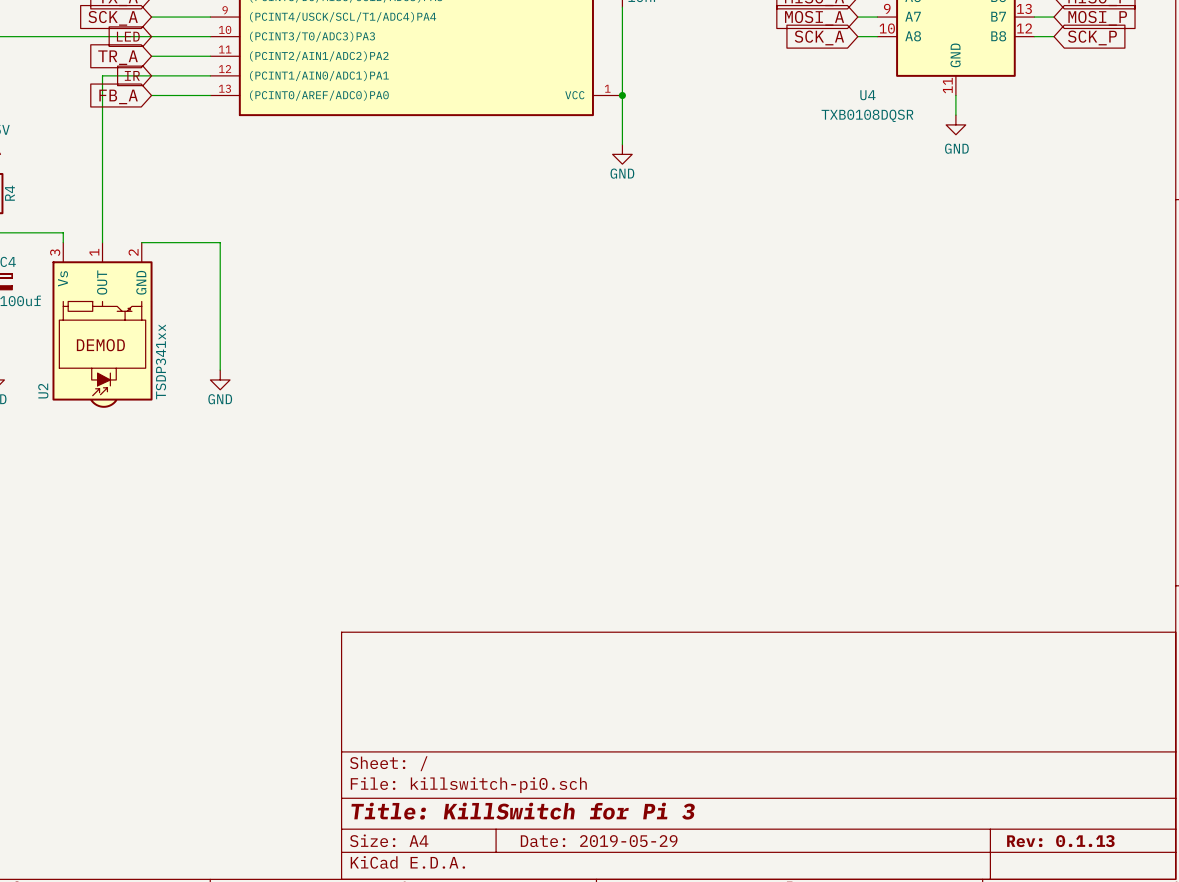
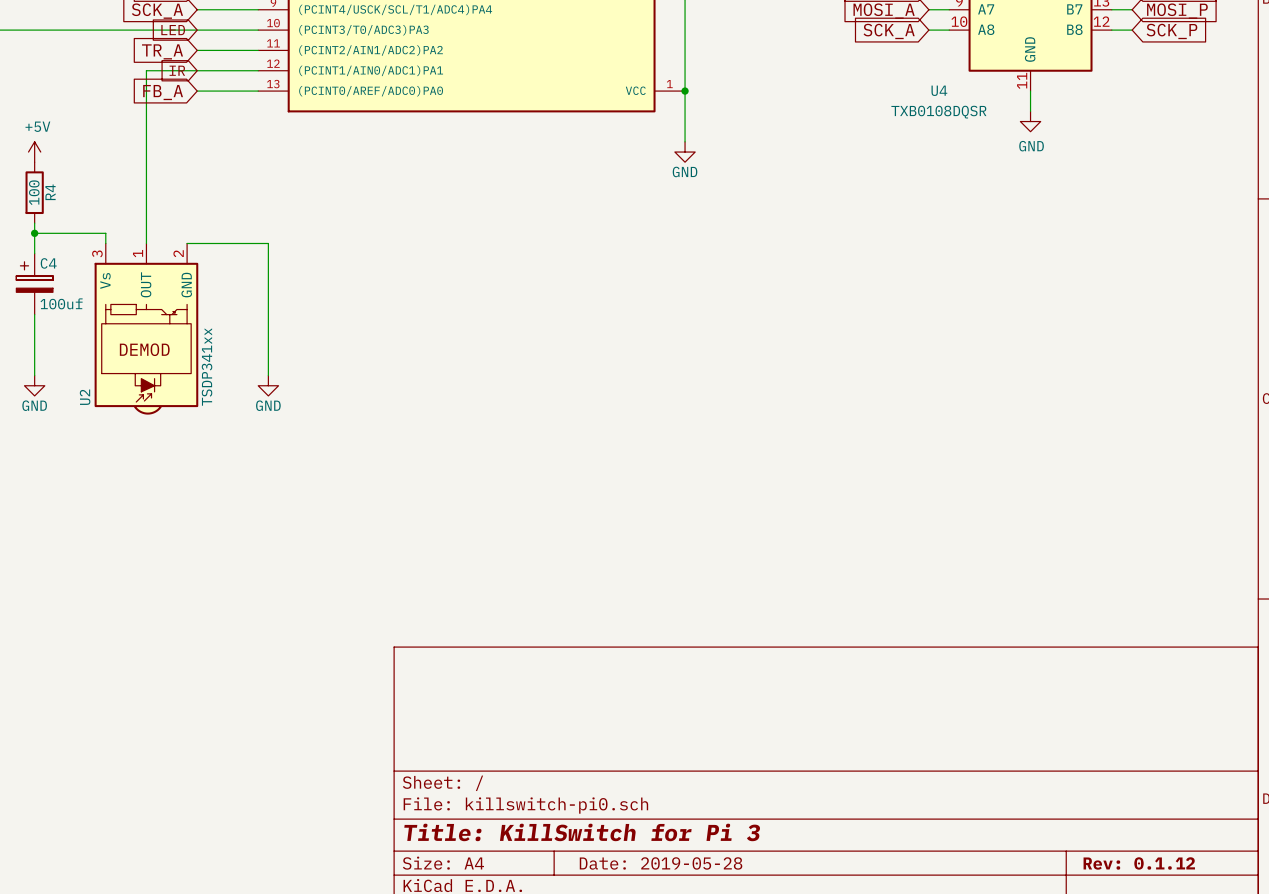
title block: Date: 2019-05-29 (599, 841) -> Date: 2019-05-28 (661, 863)
title block: Rev: 0.1.13 (1060, 841) -> Rev: 0.1.12 (1139, 863)

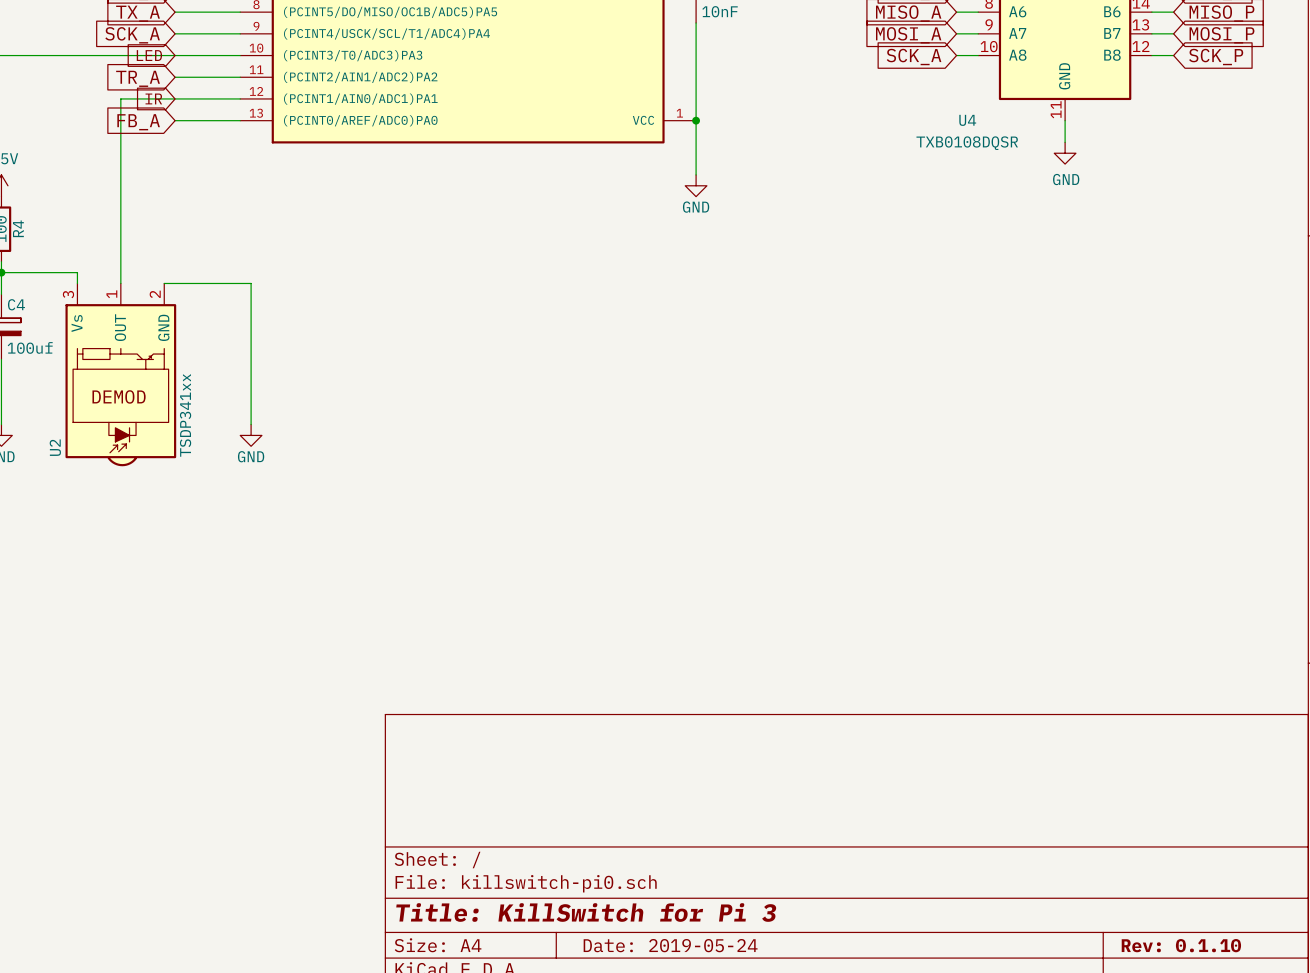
title block: Date: 2019-05-28 (661, 863) -> Date: 2019-05-24 (670, 945)
title block: Rev: 0.1.12 (1139, 863) -> Rev: 0.1.10 (1181, 945)

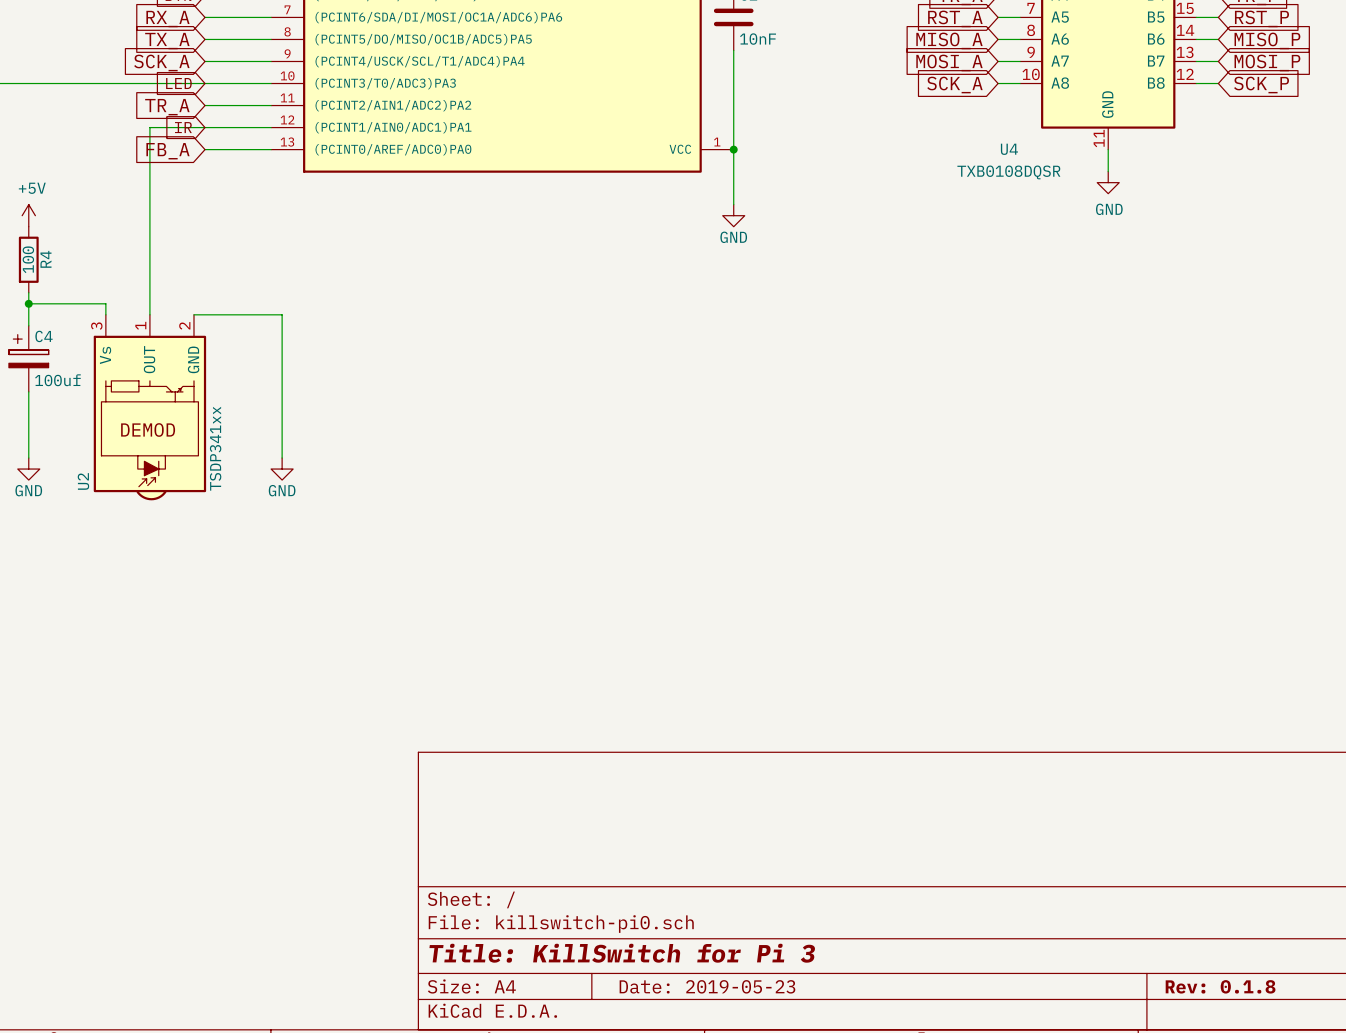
title block: Date: 2019-05-24 (670, 945) -> Date: 2019-05-23 (707, 986)
title block: Rev: 0.1.10 (1181, 945) -> Rev: 0.1.8 (1220, 986)

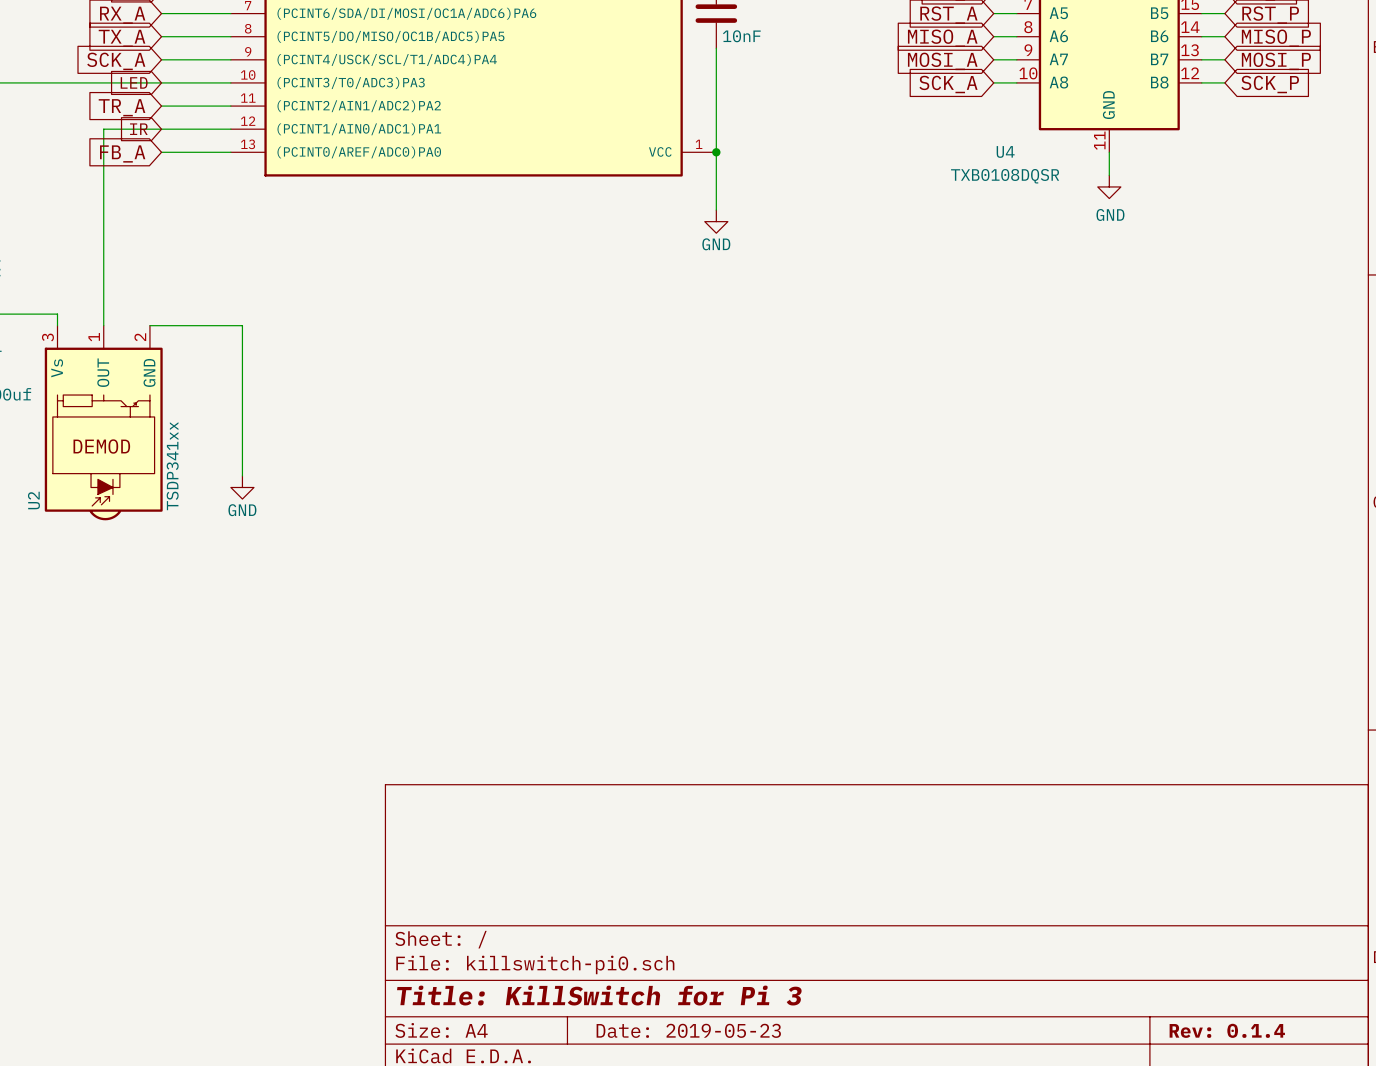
title block: Rev: 0.1.8 (1220, 986) -> Rev: 0.1.4 (1227, 1030)

